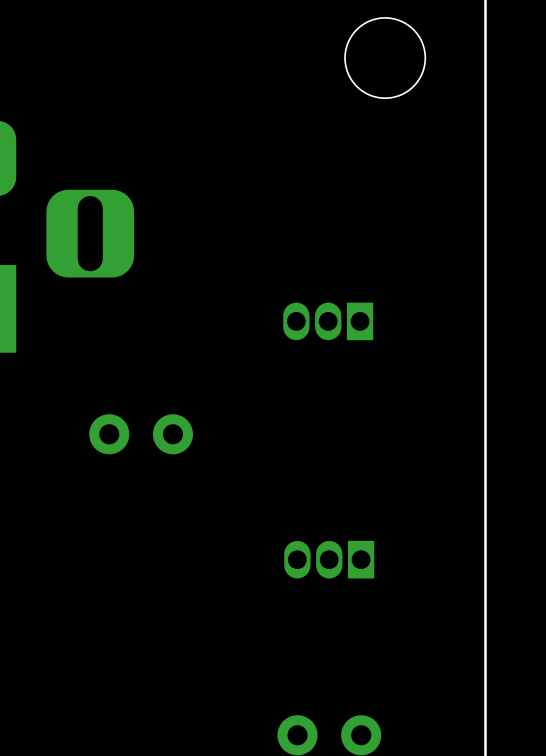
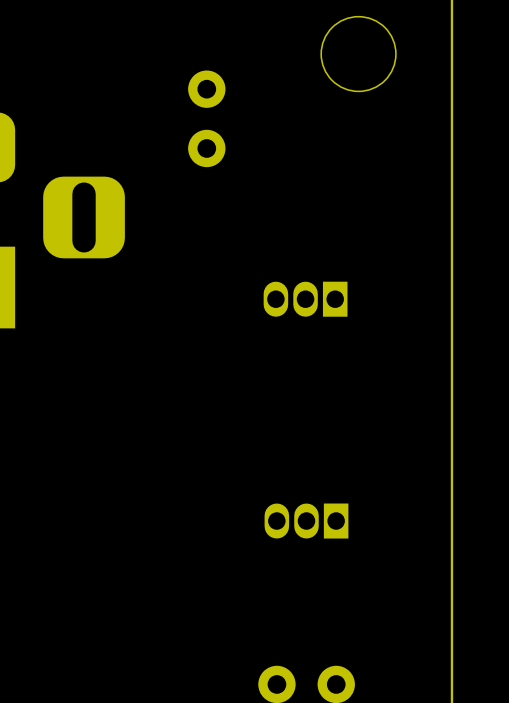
part rotation: 0° (141, 434) -> 90° clockwise (206, 118)
part position: (141, 434) -> (206, 118)

